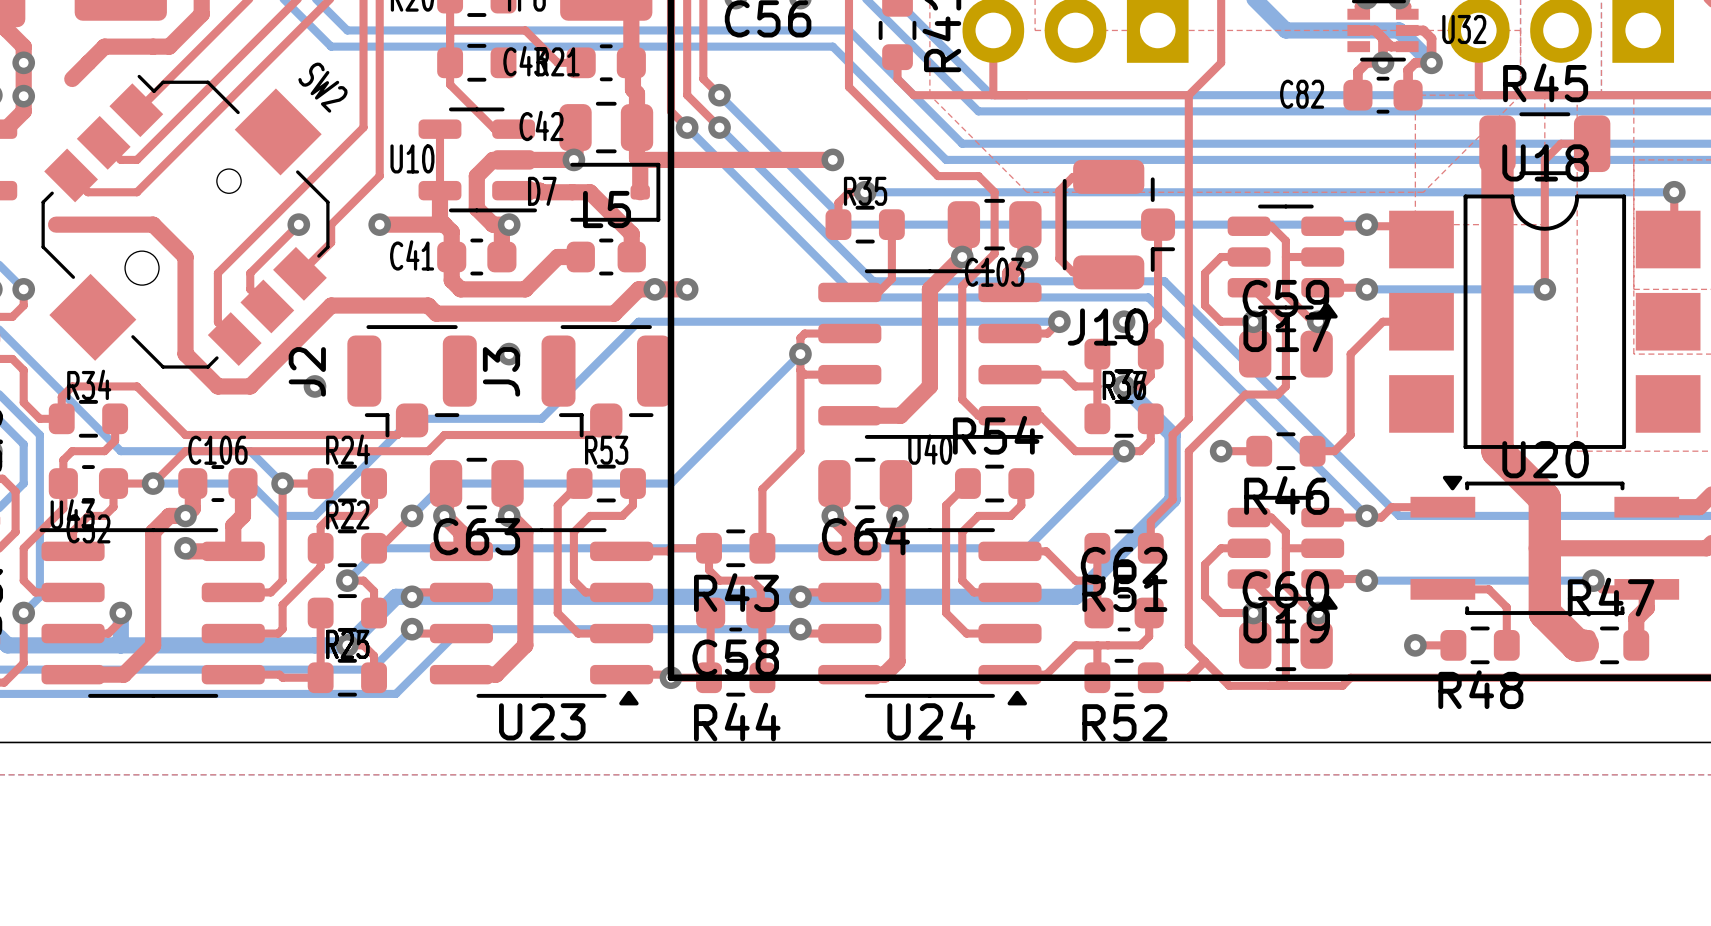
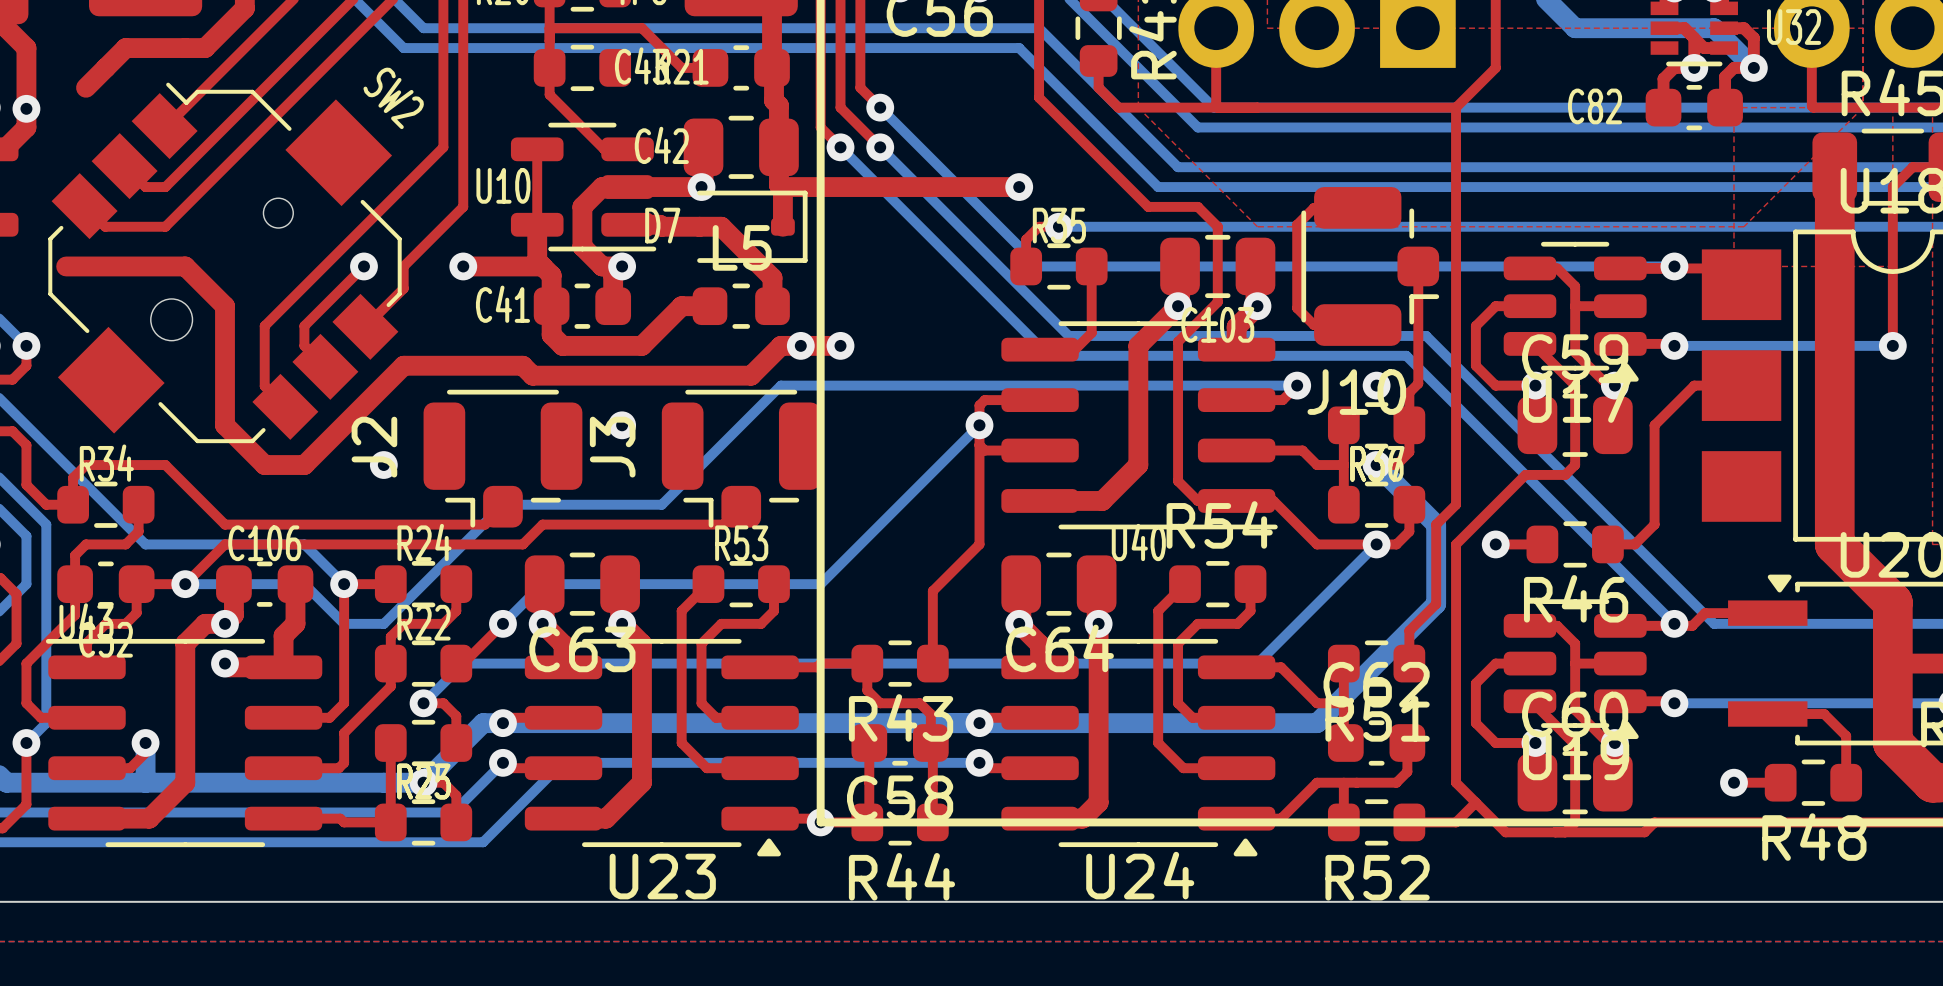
via: (23, 62) -> none

